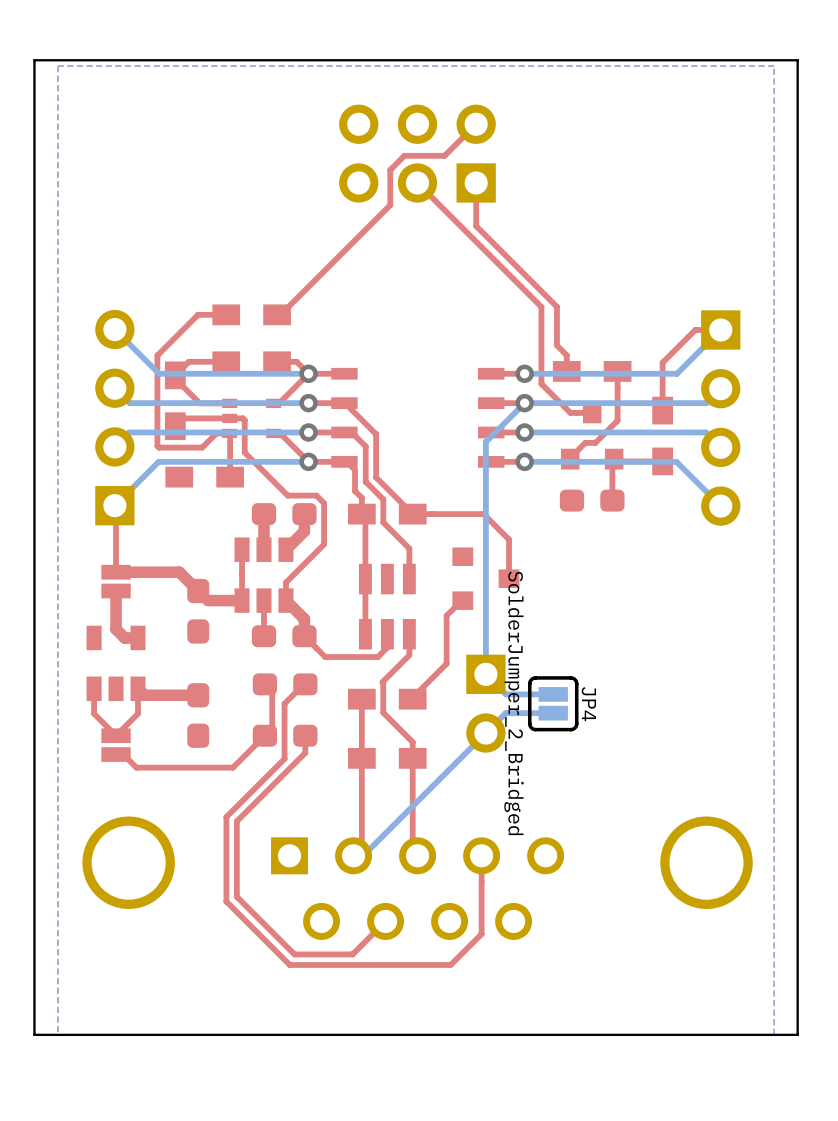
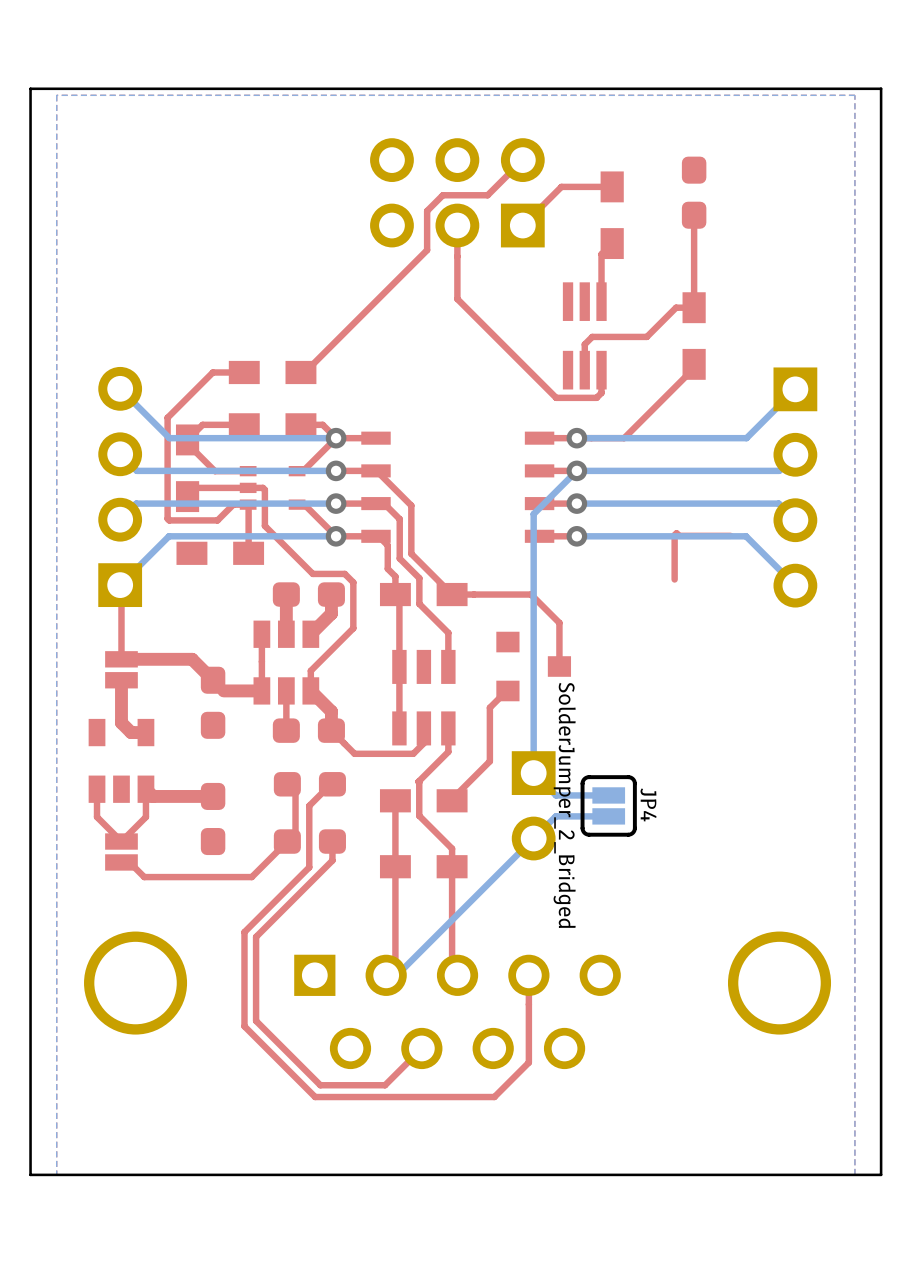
part: none -> (612, 215)
top track: none -> (694, 215) (694, 307) (676, 307) (646, 336) (592, 336) (584, 344) (584, 370)
top track: (417, 182) (541, 306) (541, 383) (570, 412) (592, 412) -> (457, 225) (457, 299) (556, 397) (596, 397) (601, 392) (601, 370)
top track: (476, 182) (476, 226) (556, 306) (556, 345) (566, 355) (566, 371) -> (522, 225) (561, 186) (612, 186)
top track: none -> (612, 243) (601, 254) (601, 301)
part: none -> (584, 335)
part: none -> (694, 336)
top track: none -> (694, 364) (694, 368) (624, 438) (576, 438)
top track: (720, 329) (695, 329) (662, 362) (662, 410) -> none
part: (592, 371) -> none
top track: (617, 371) (617, 420) (595, 442) (585, 442) (570, 459) -> none
part: (592, 436) -> none
part: (662, 436) -> none
part rotation: 0° (592, 500) -> 90° clockwise (694, 192)
part position: (592, 500) -> (694, 192)

